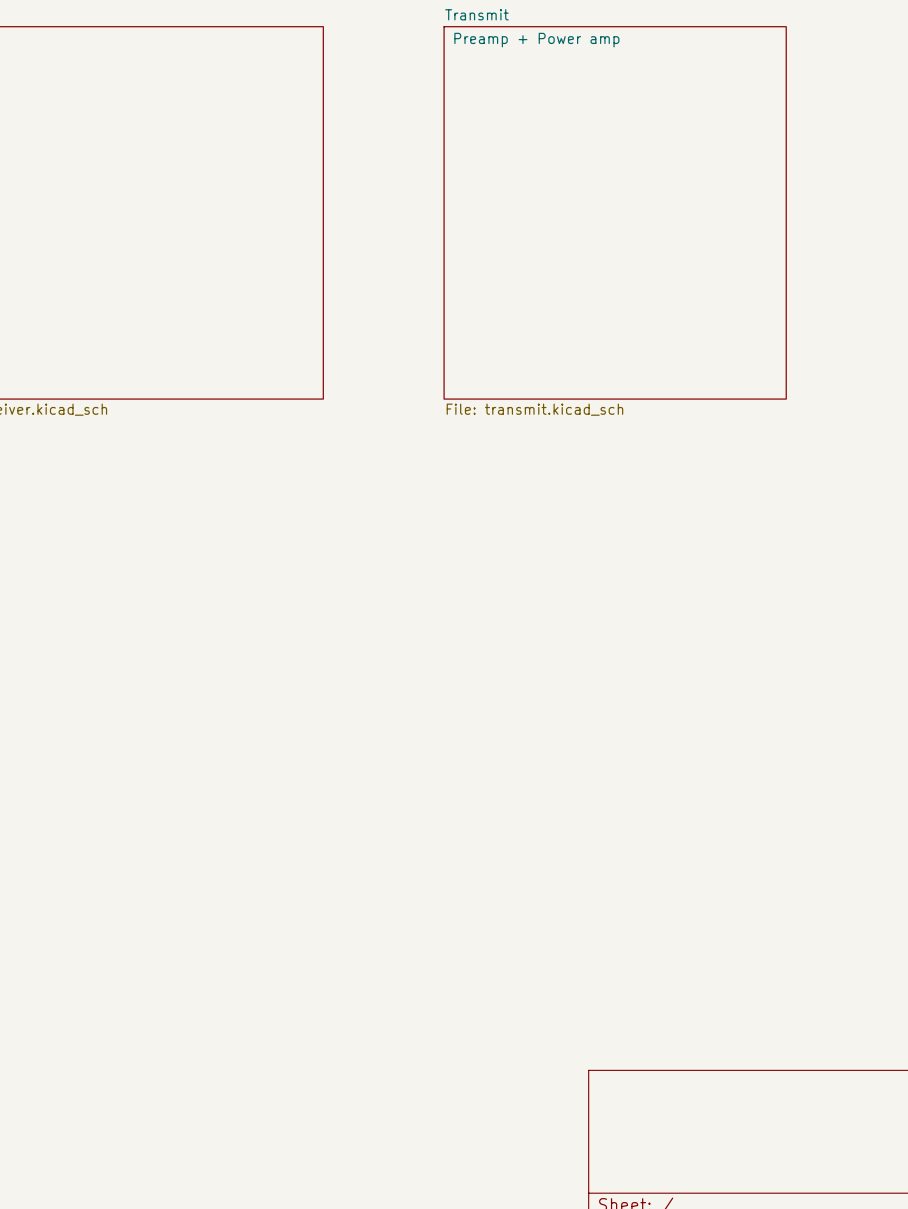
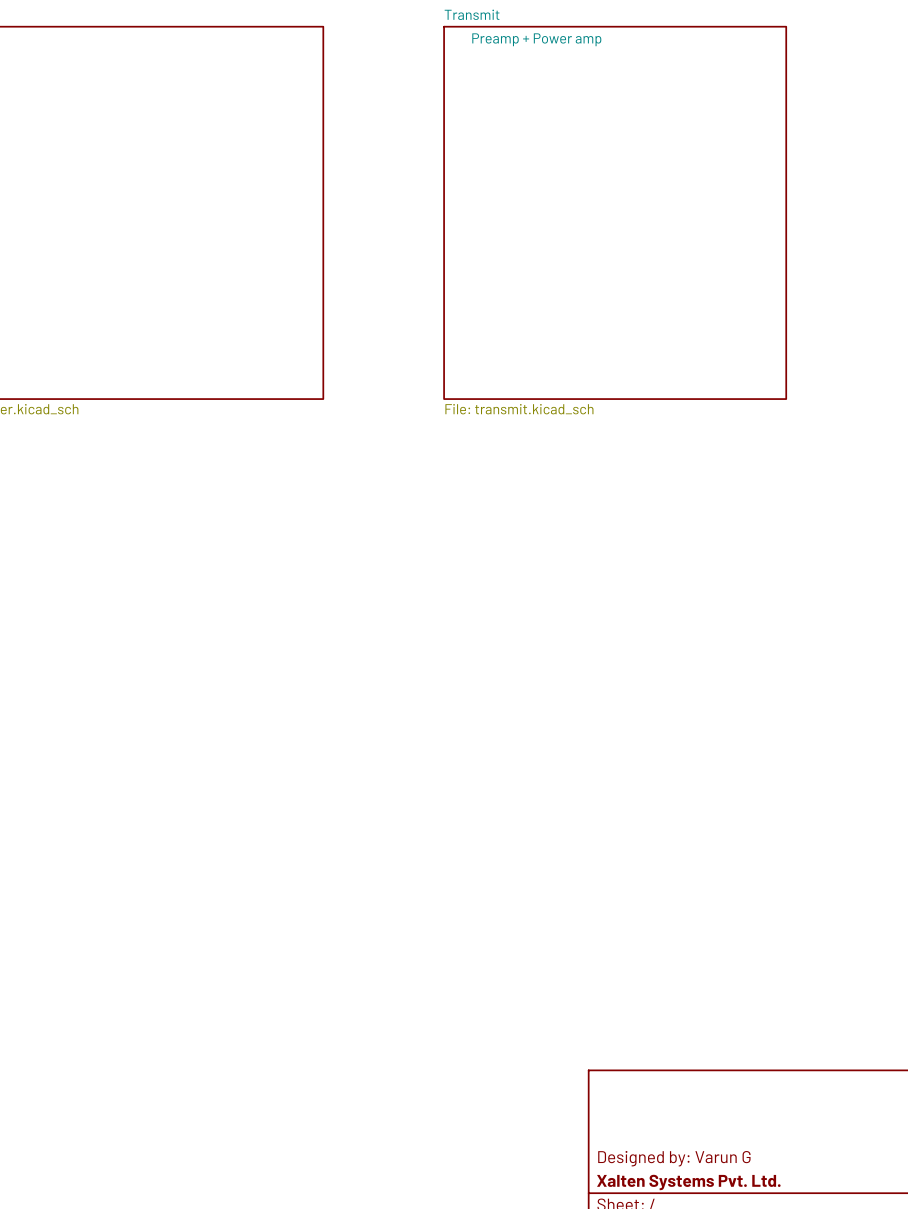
title block: none -> Designed by: Varun G (674, 1158)
title block: none -> Xalten Systems Pvt. Ltd. (688, 1182)

